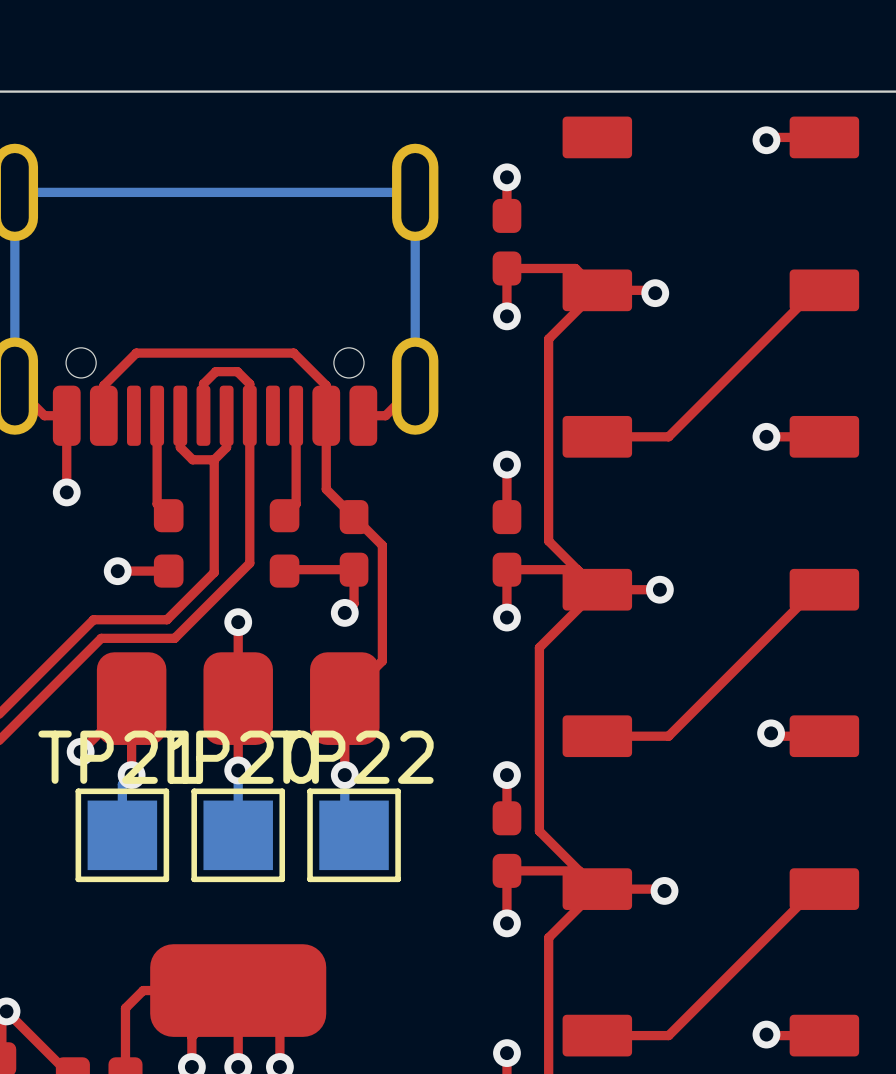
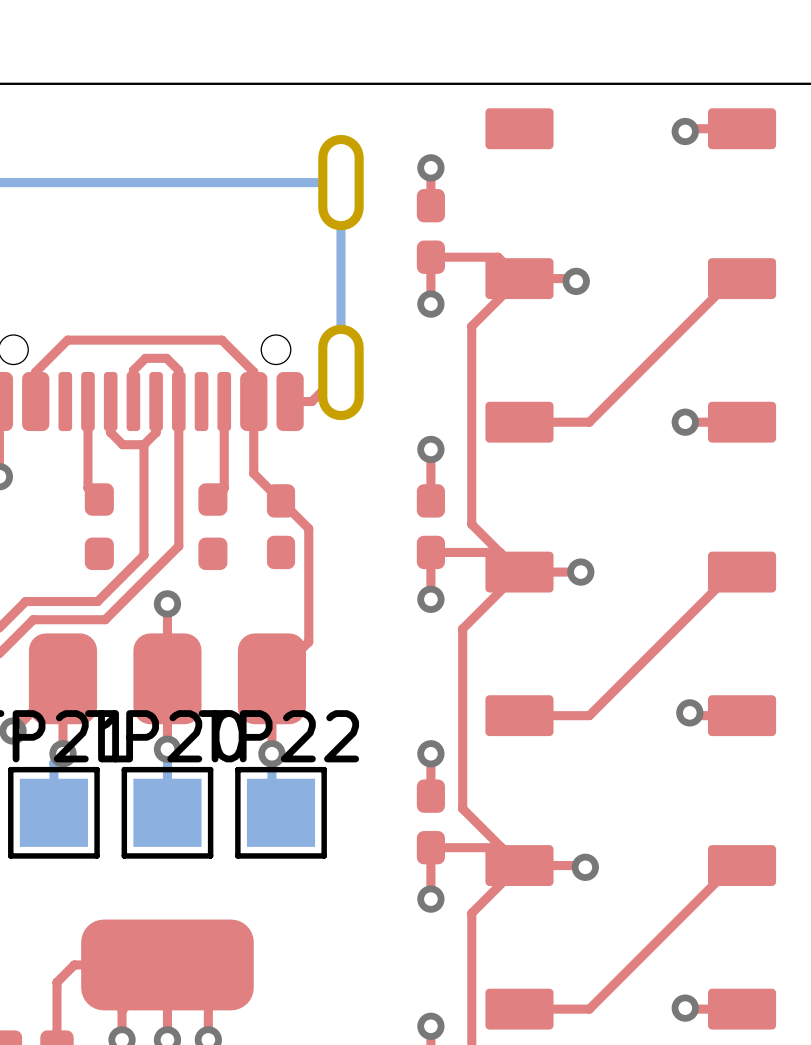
via: (117, 571) -> none
top track: (168, 571) (117, 571) -> none
top track: (284, 571) (354, 569) (354, 603) (344, 612) -> none
via: (344, 612) -> none

